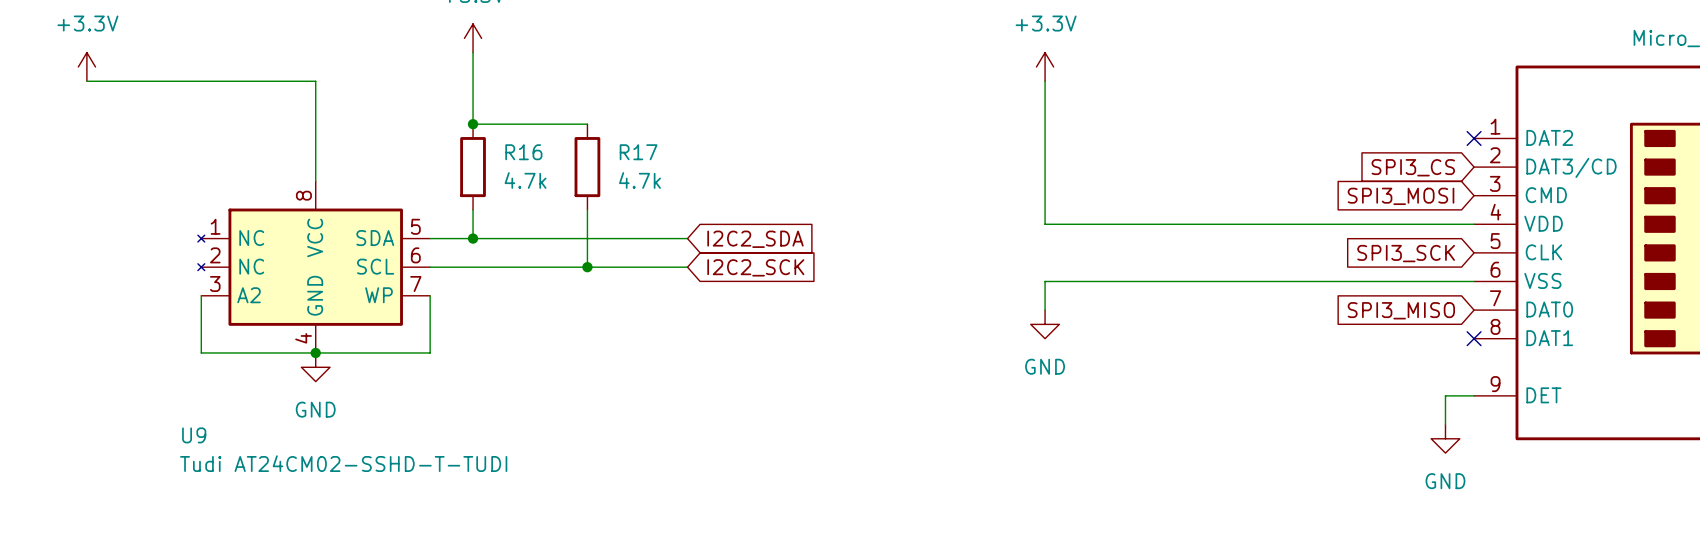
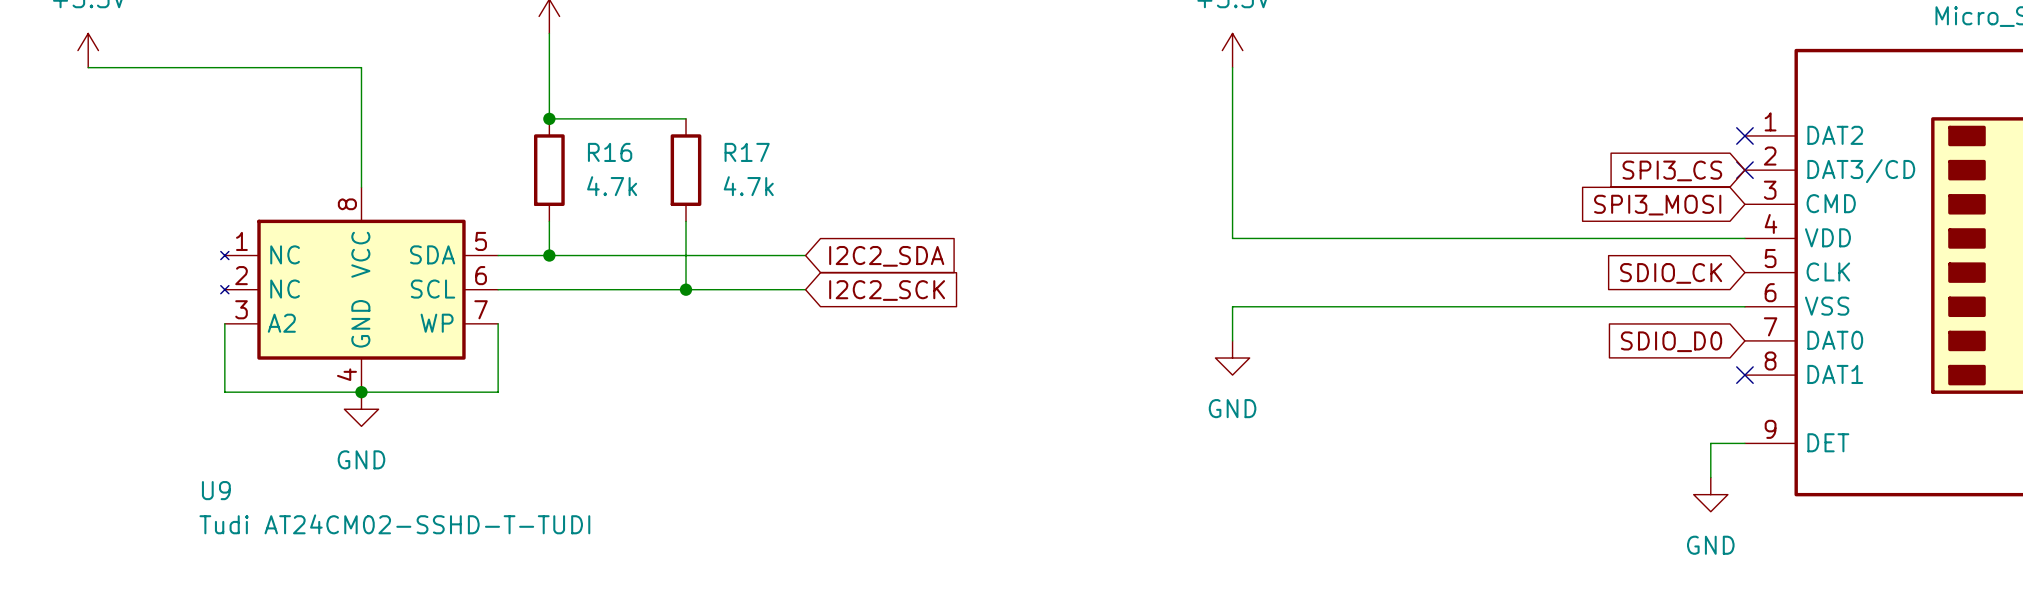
no-connect mark: none -> (1744, 170)
global label: SPI3_SCK (1406, 253) -> SDIO_CK (1671, 273)
global label: SPI3_MISO (1401, 310) -> SDIO_D0 (1671, 341)

